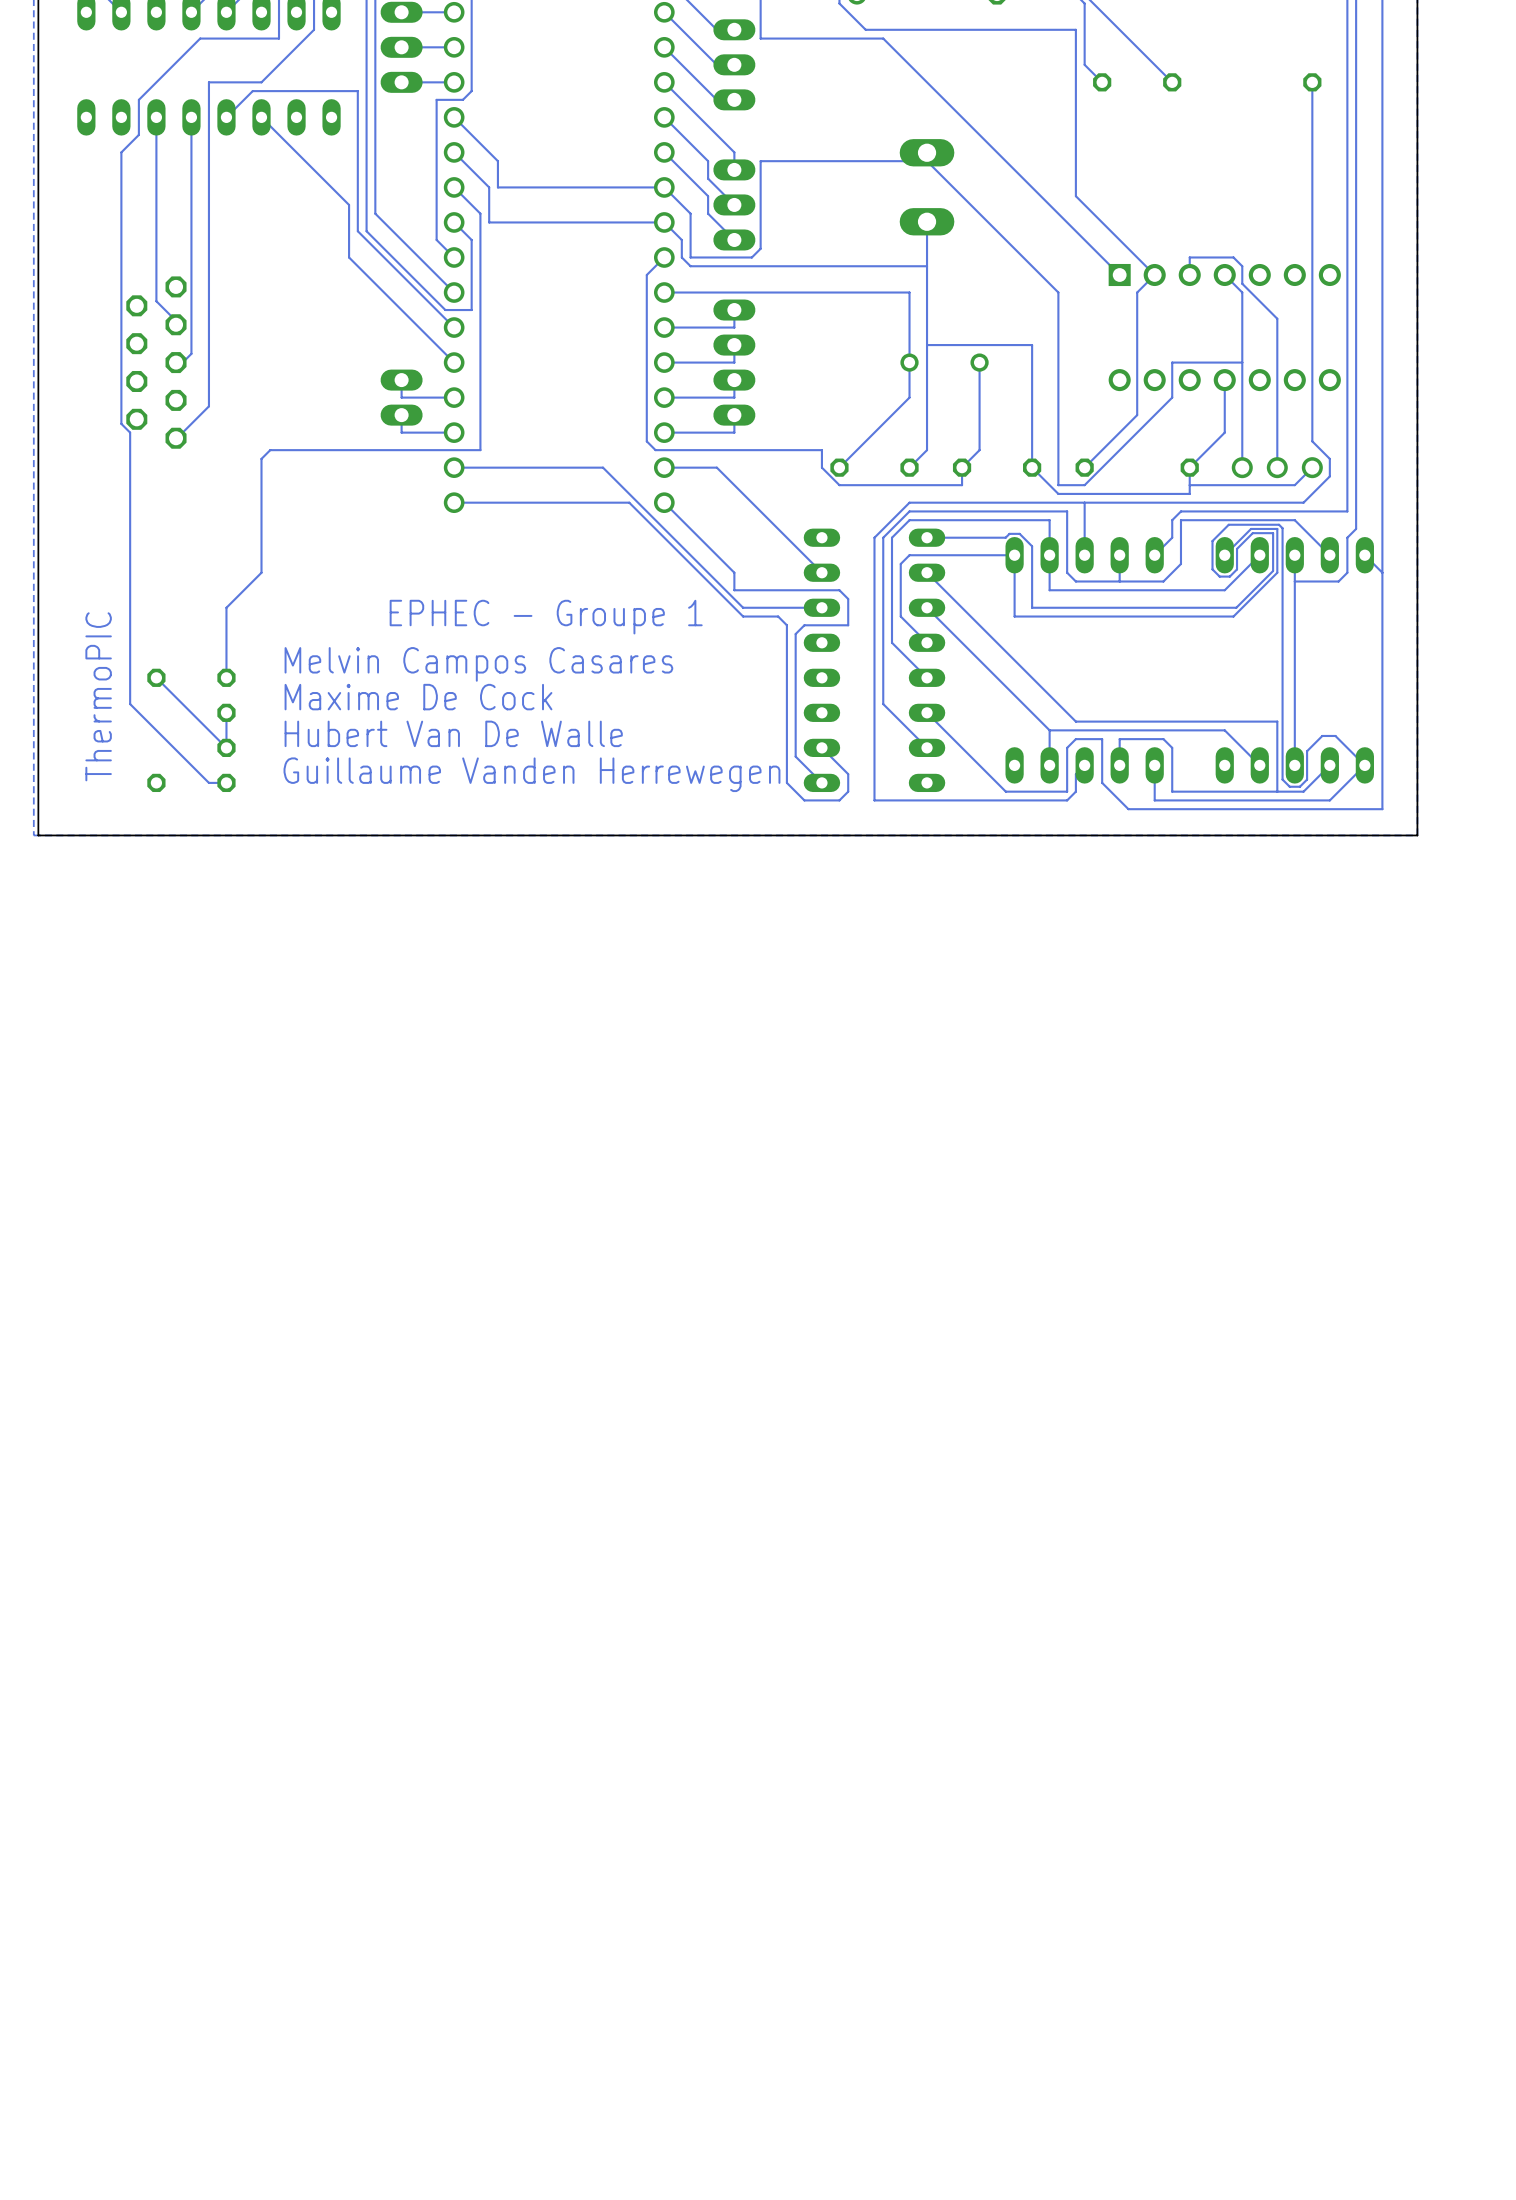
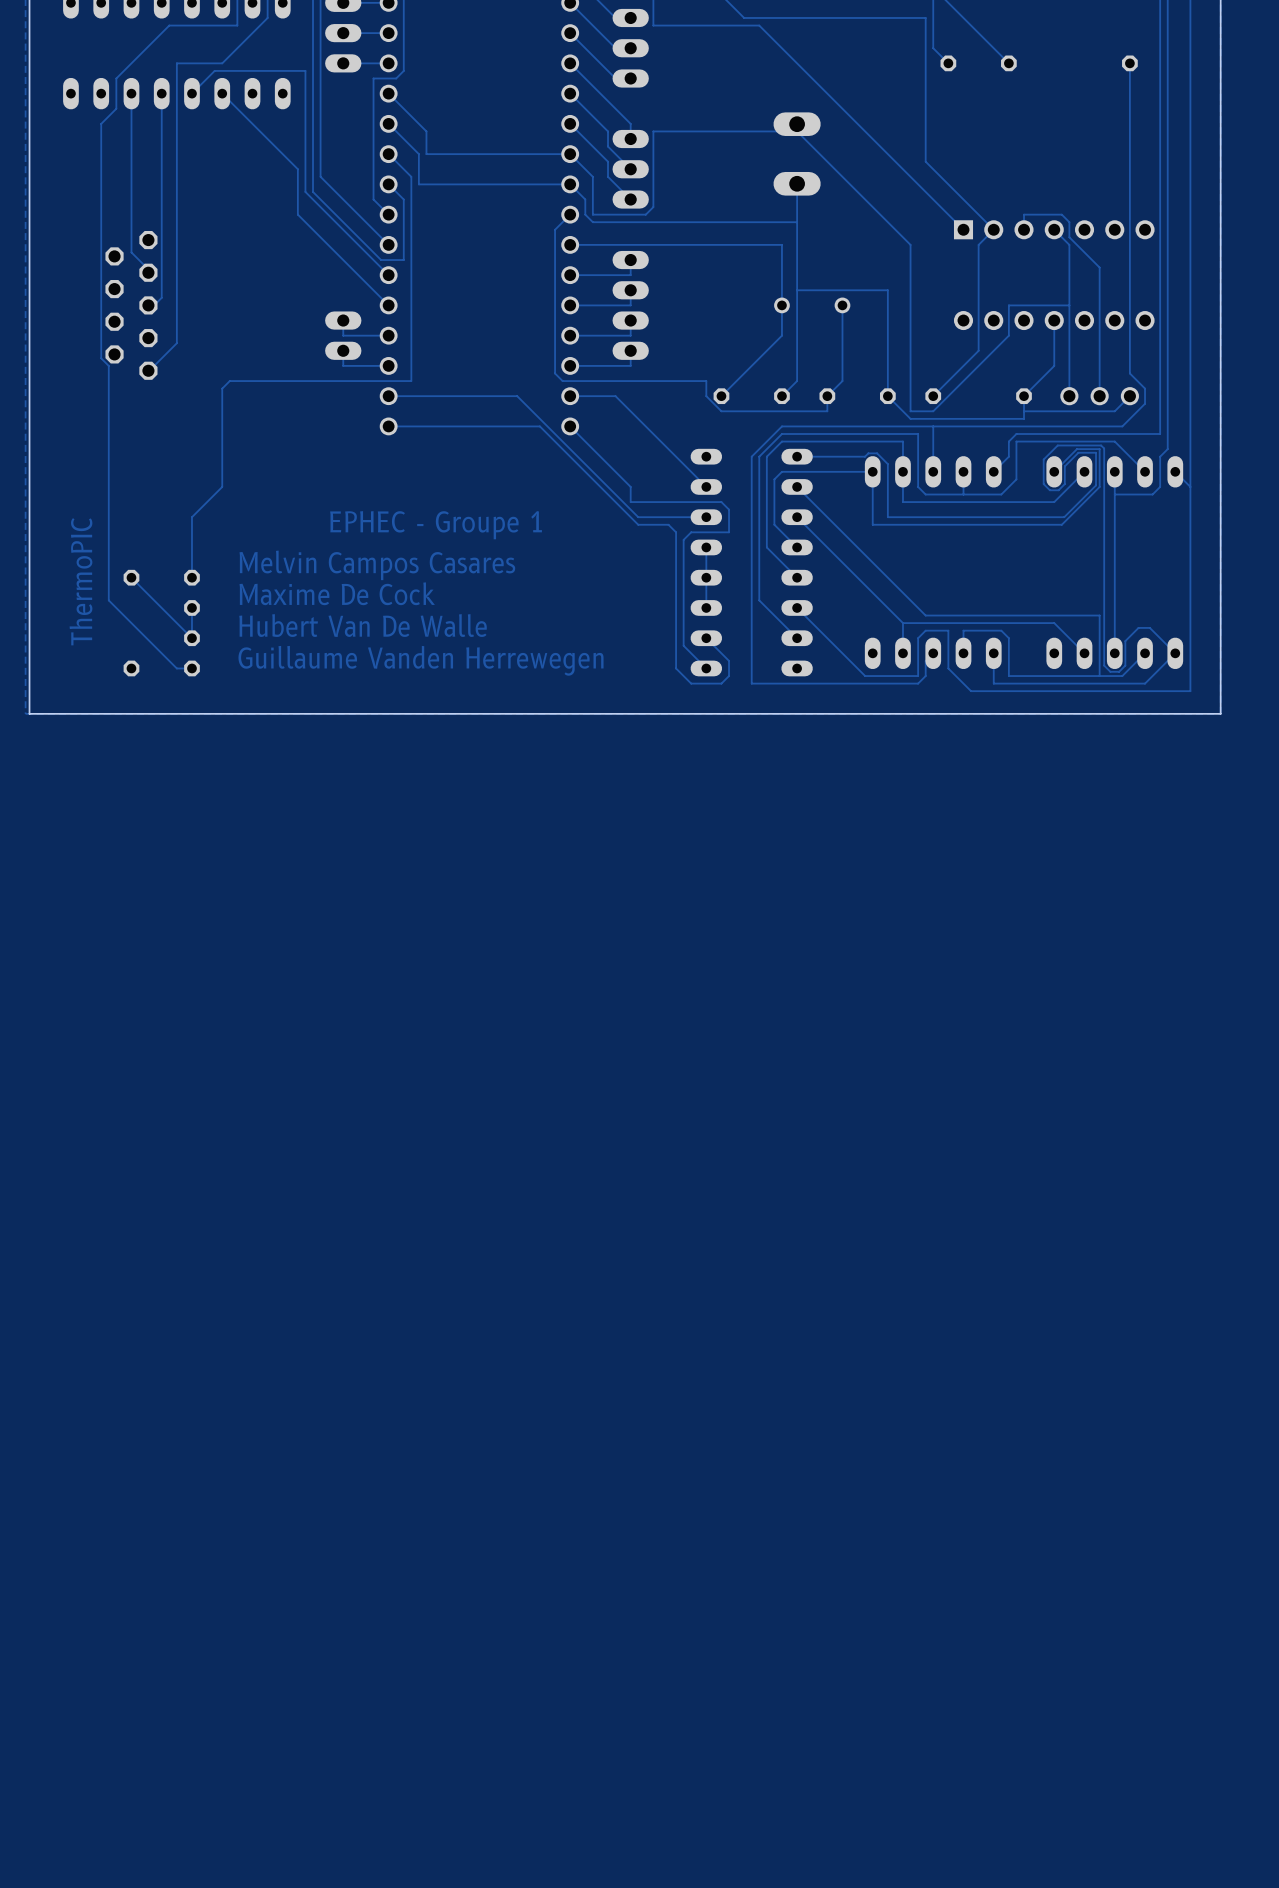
track: none -> (706, 547) (706, 607)

